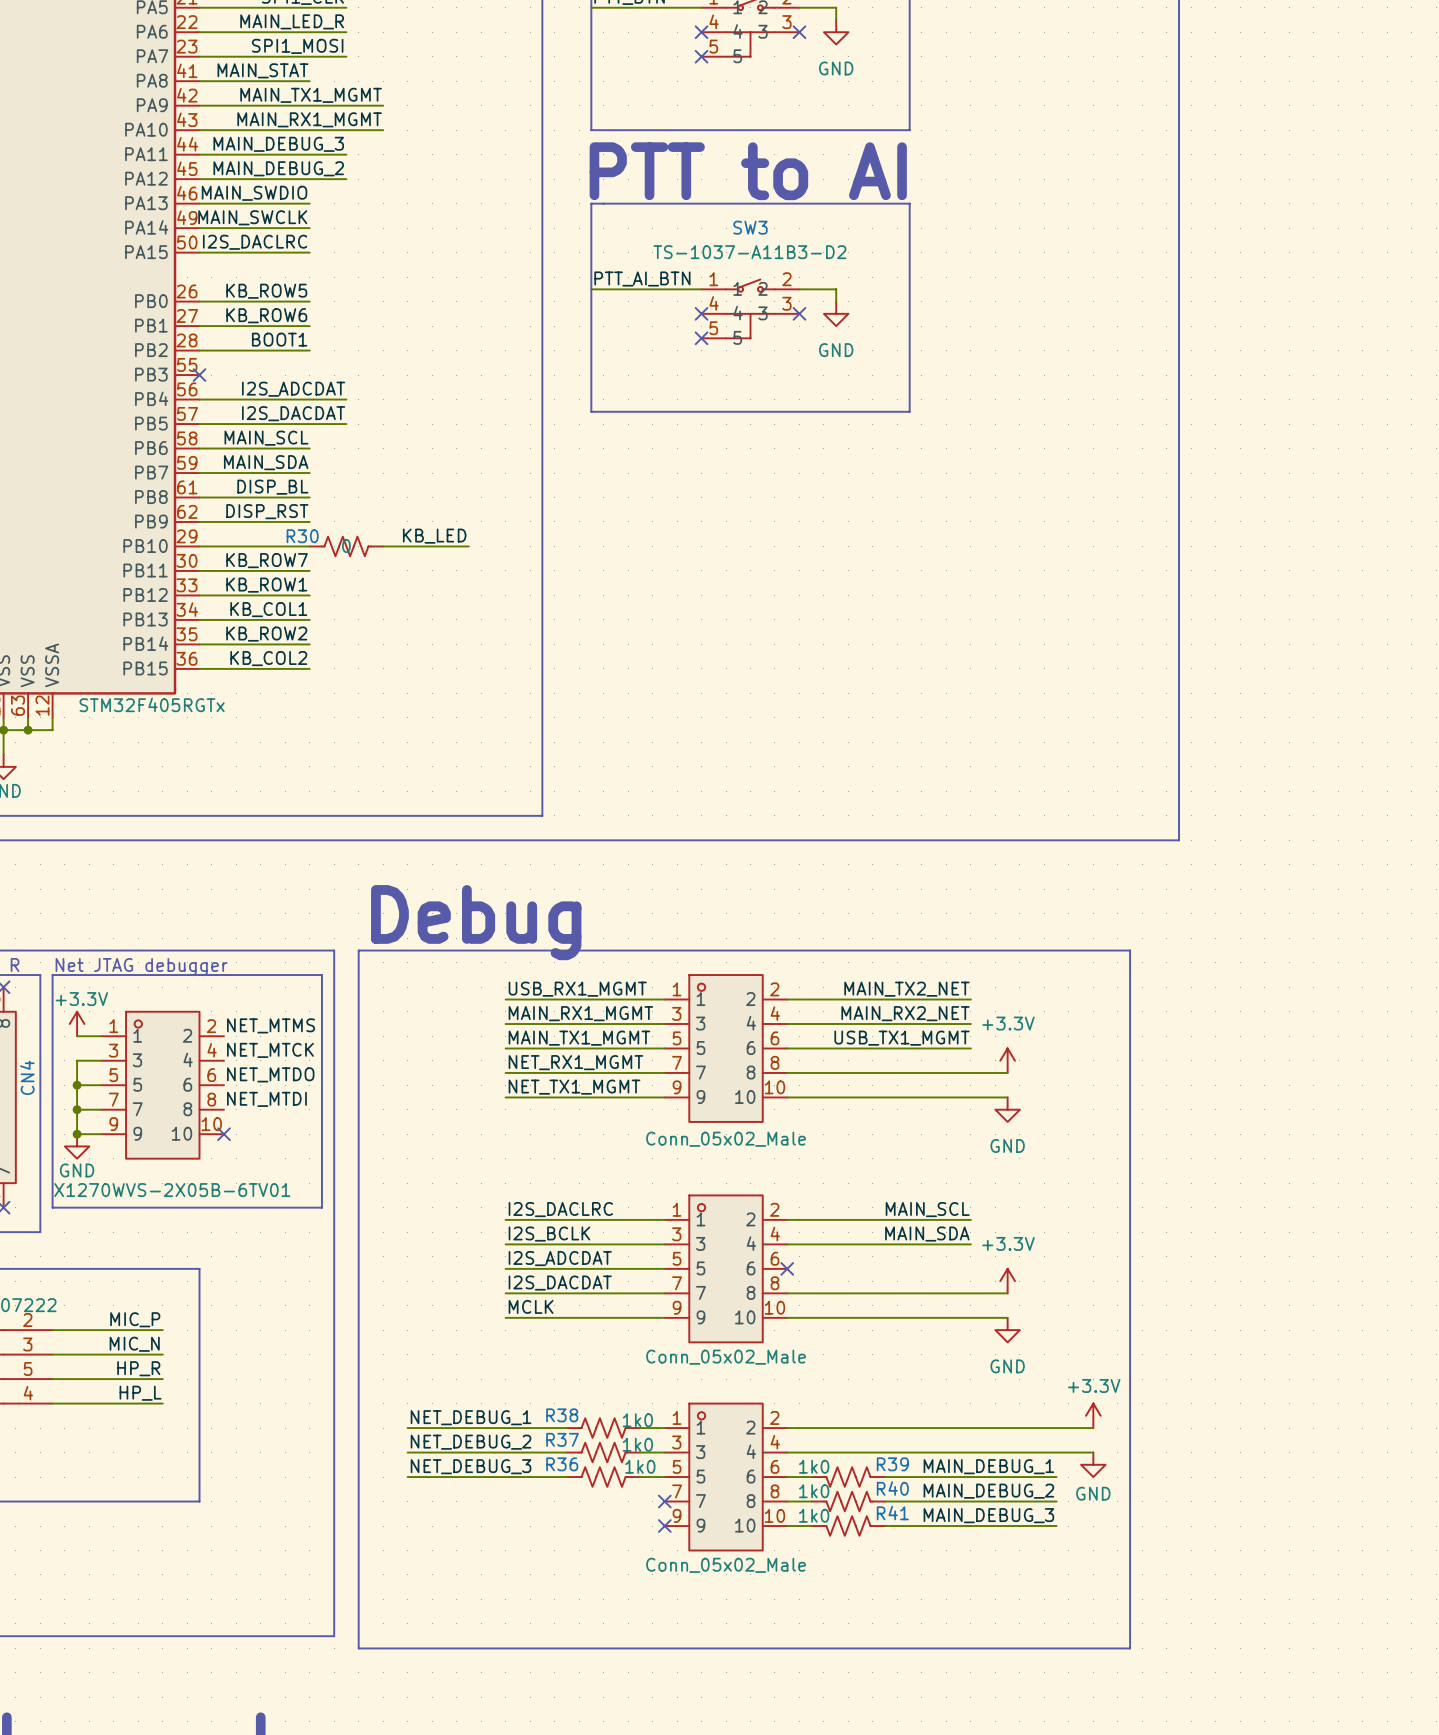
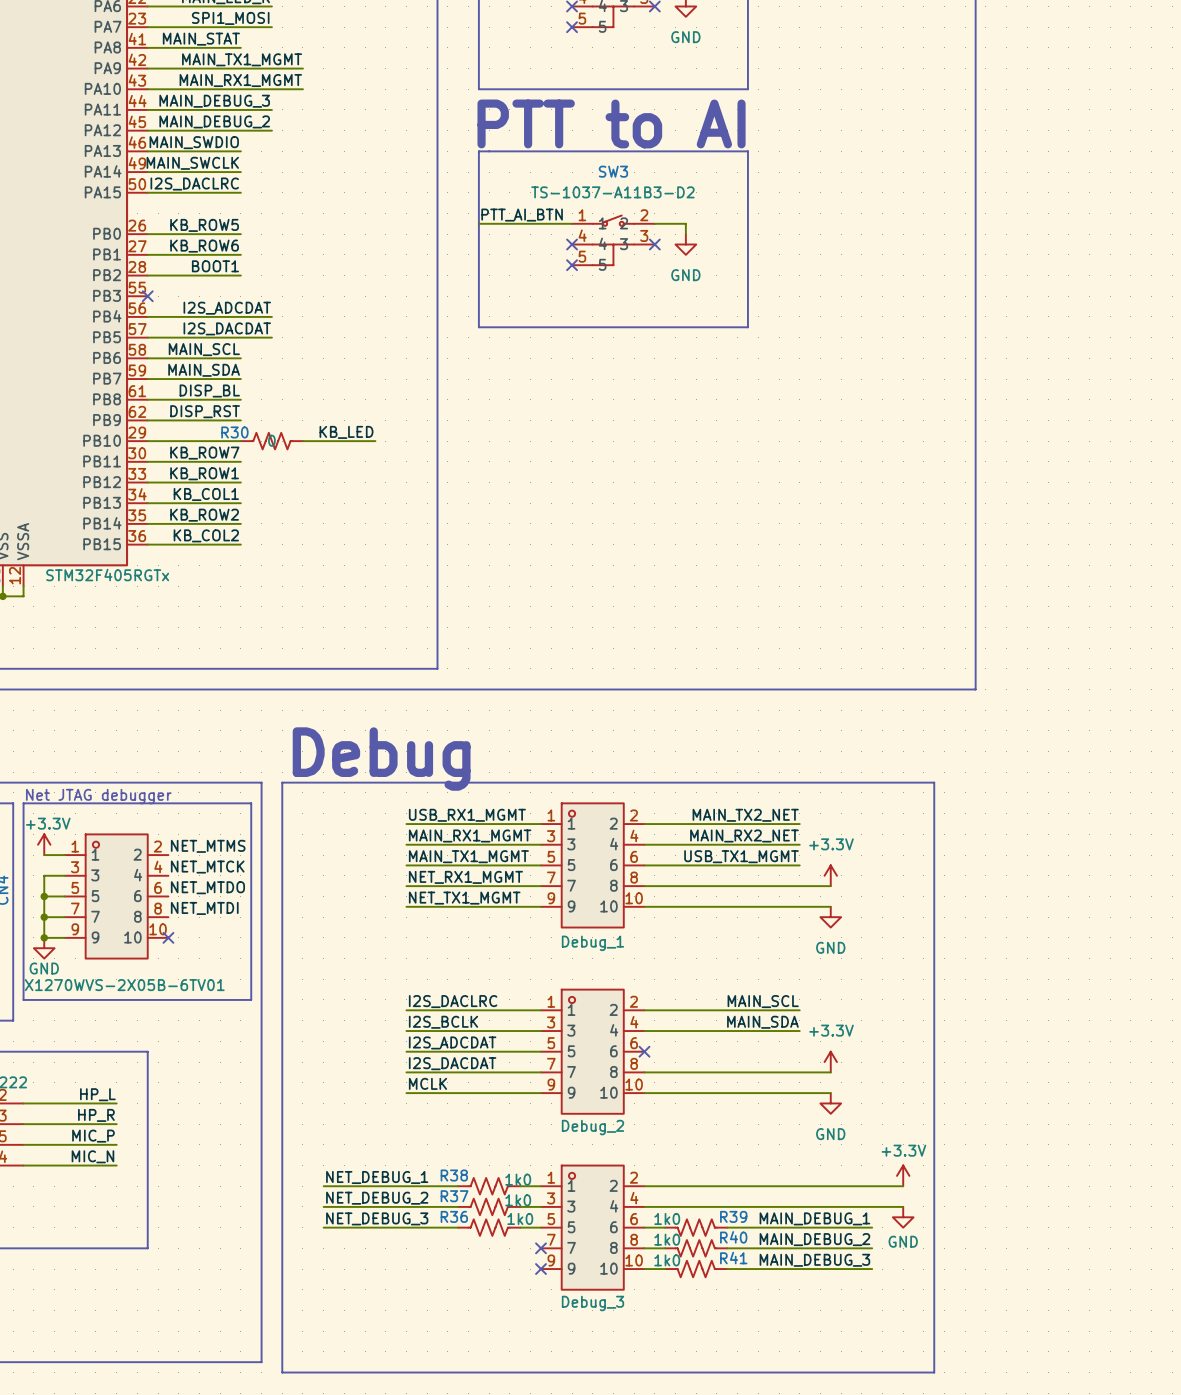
part value: Conn_05x02_Male (726, 1139) -> Debug_1 (592, 943)
label: MIC_P (135, 1319) -> HP_L (97, 1094)
label: MIC_N (134, 1344) -> HP_R (96, 1115)
part value: Conn_05x02_Male (726, 1357) -> Debug_2 (592, 1127)
label: HP_R (138, 1368) -> MIC_P (93, 1136)
label: HP_L (140, 1393) -> MIC_N (92, 1156)
part value: Conn_05x02_Male (726, 1565) -> Debug_3 (592, 1303)

